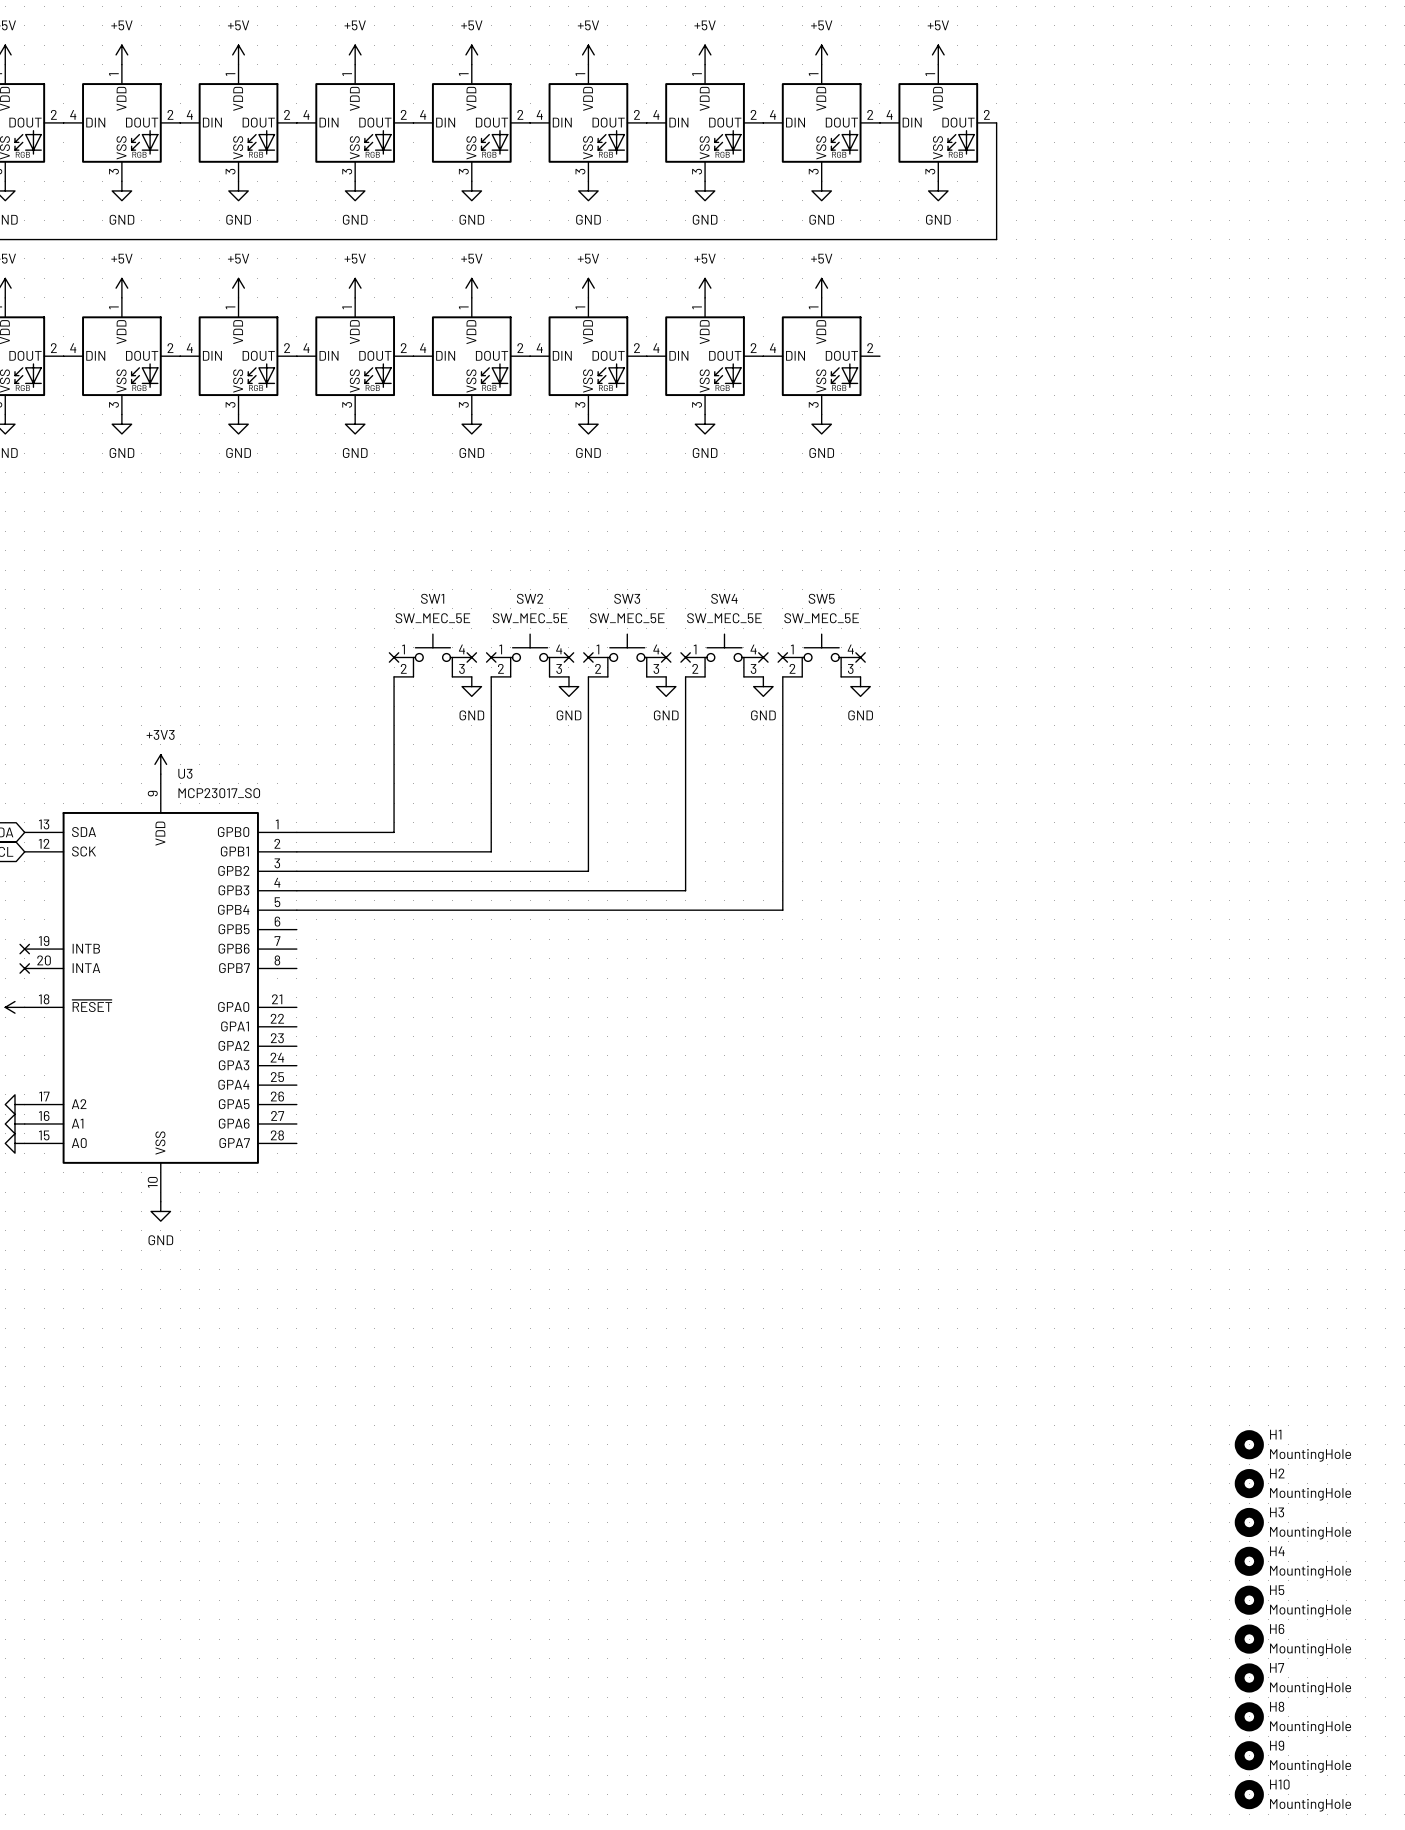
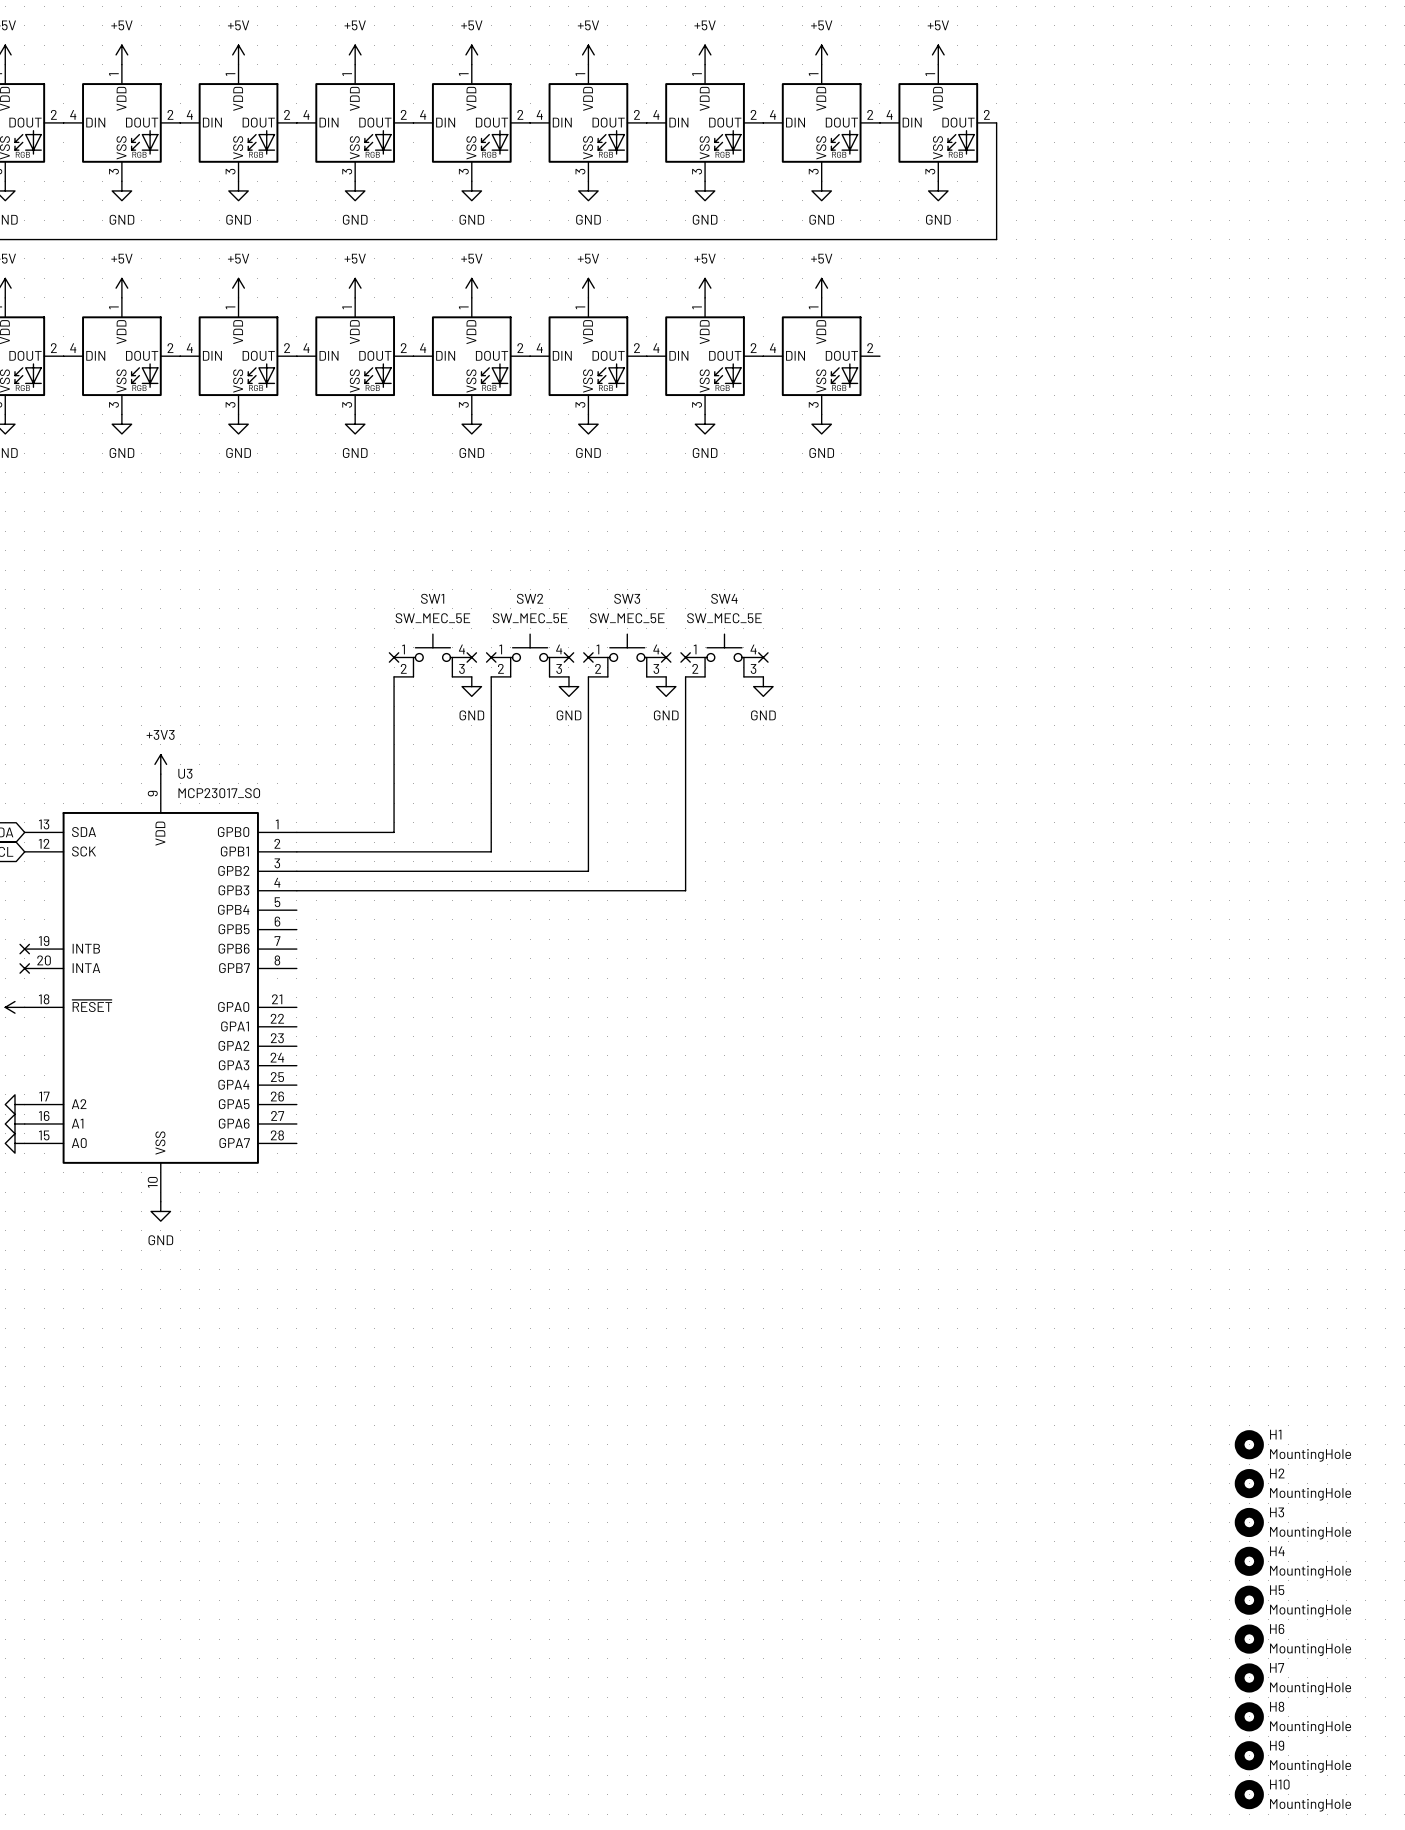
SW5: SW_MEC_5E (821, 655) -> none
no-connect mark: (782, 657) -> none
no-connect mark: (860, 657) -> none
wire: (782, 676) (782, 910) (296, 910) -> none
power symbol: GND (860, 686) -> none

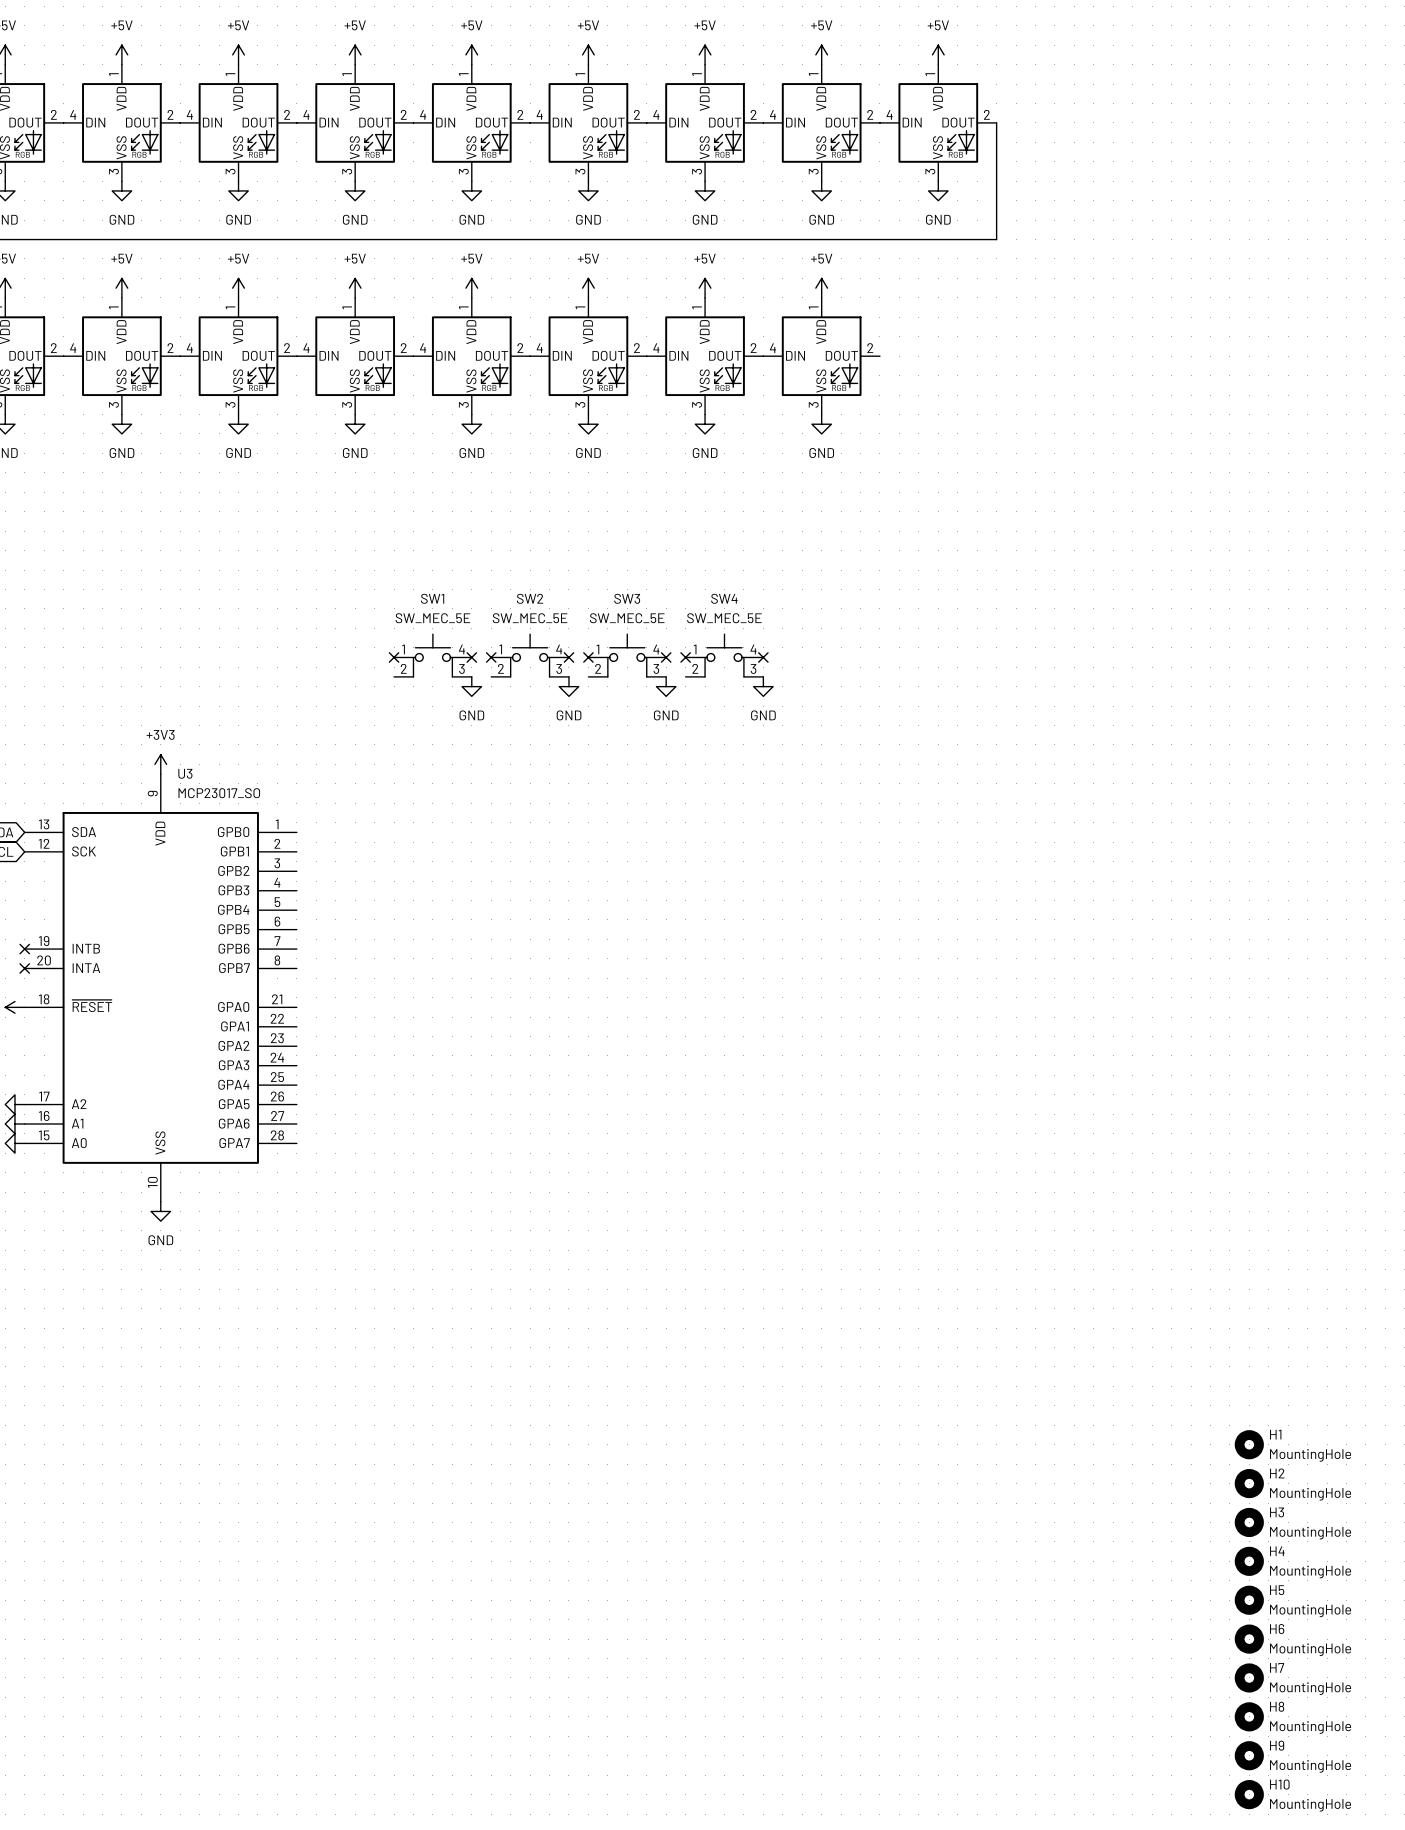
wire: (394, 676) (394, 832) (296, 832) -> none
wire: (491, 676) (491, 851) (296, 851) -> none
wire: (588, 676) (588, 871) (296, 871) -> none
wire: (685, 676) (685, 890) (296, 890) -> none

